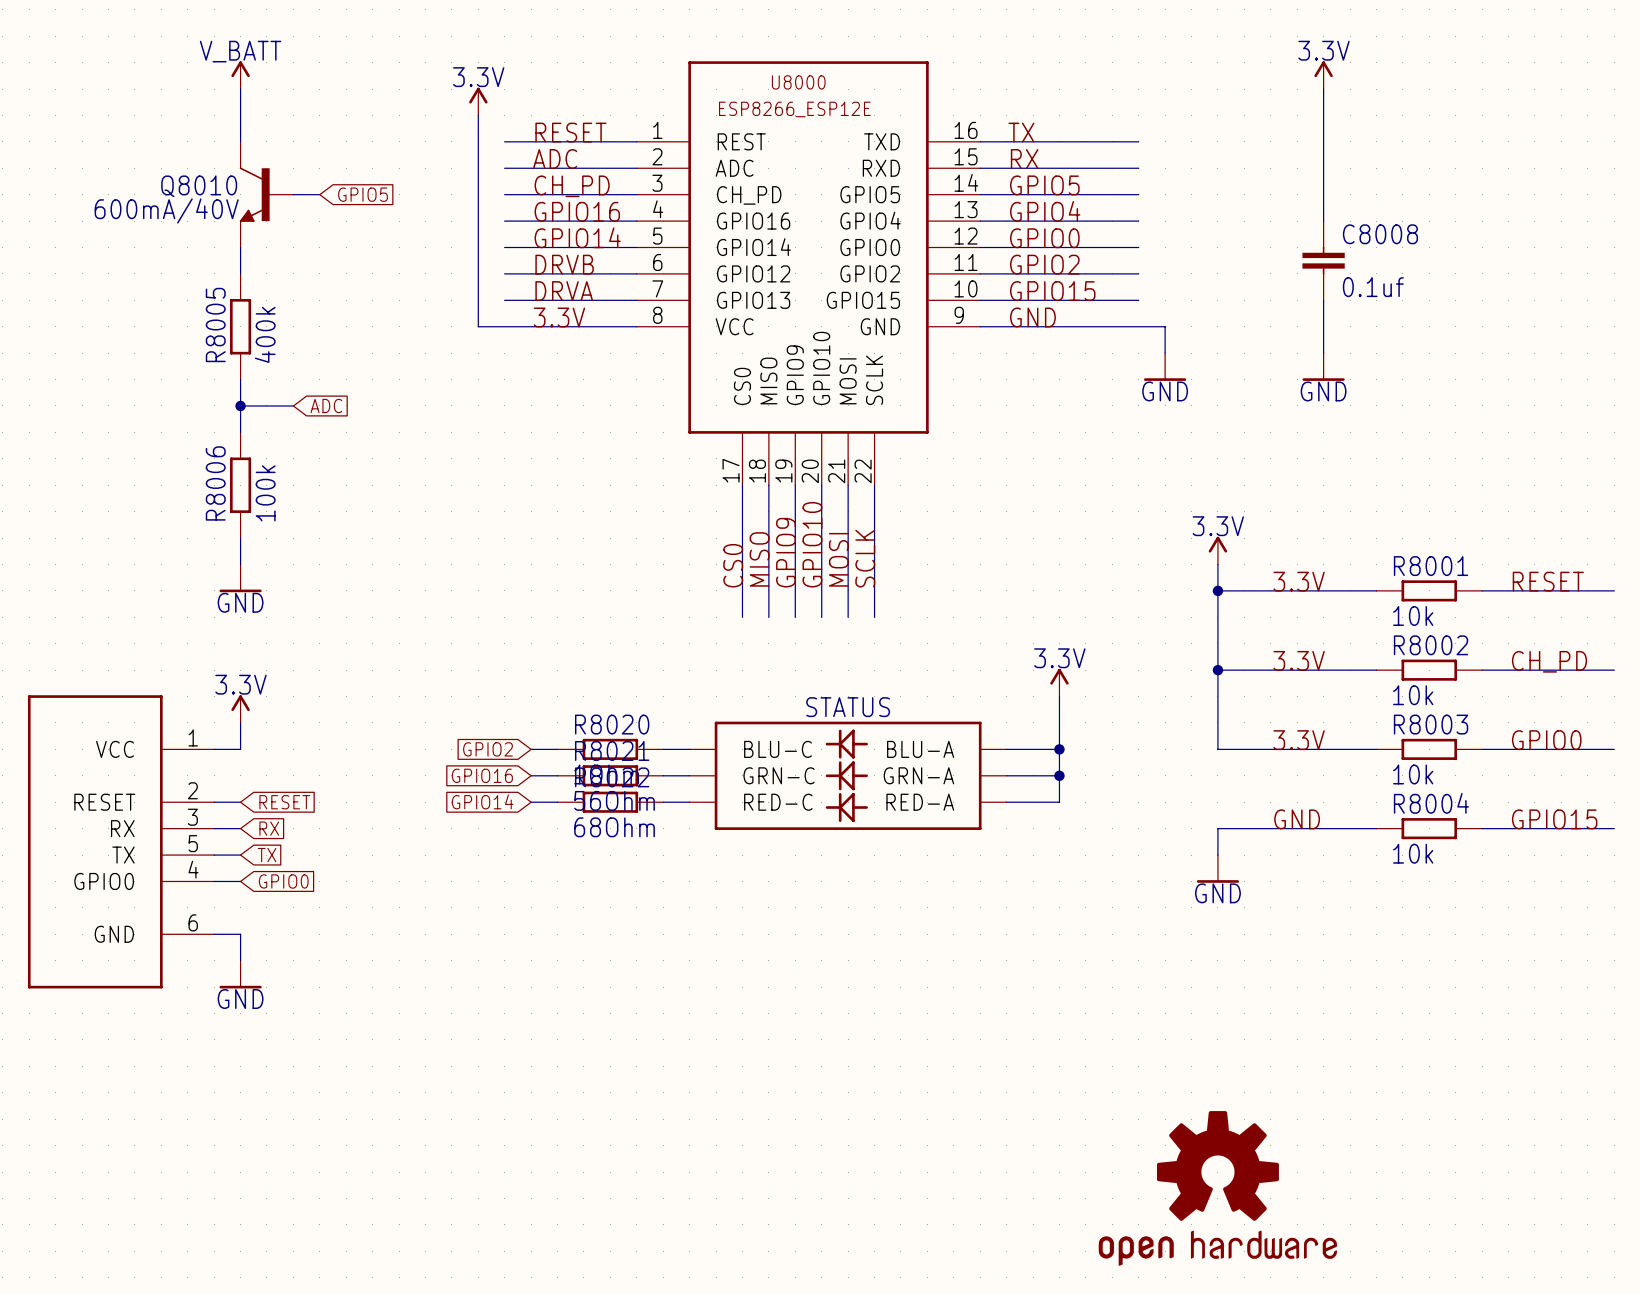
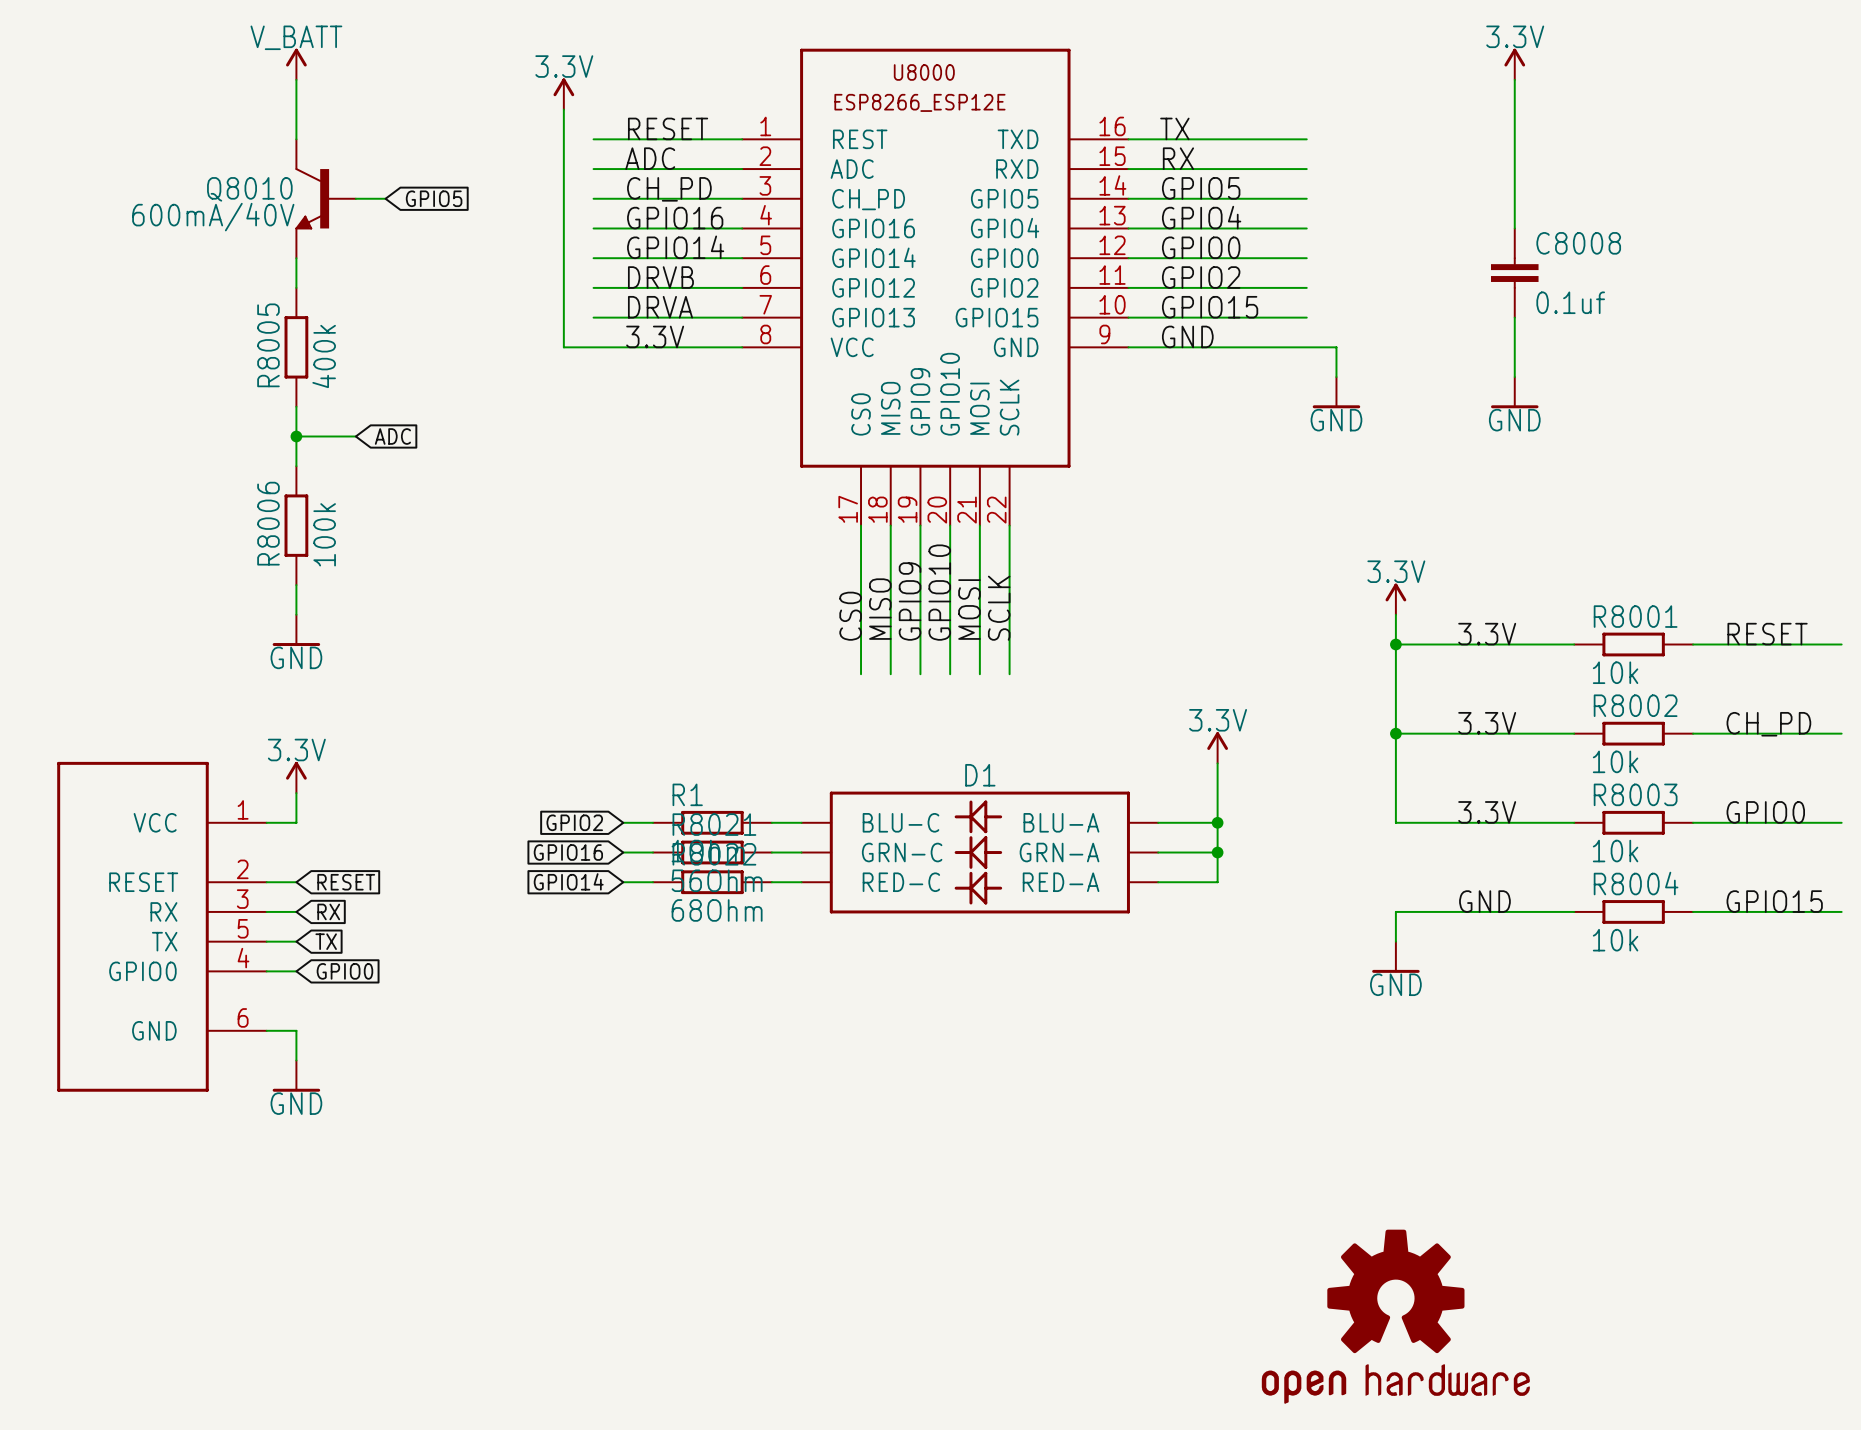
STATUS name: STATUS (848, 707) -> D1 (980, 775)
R8020 name: R8020 (612, 724) -> R1 (687, 794)

